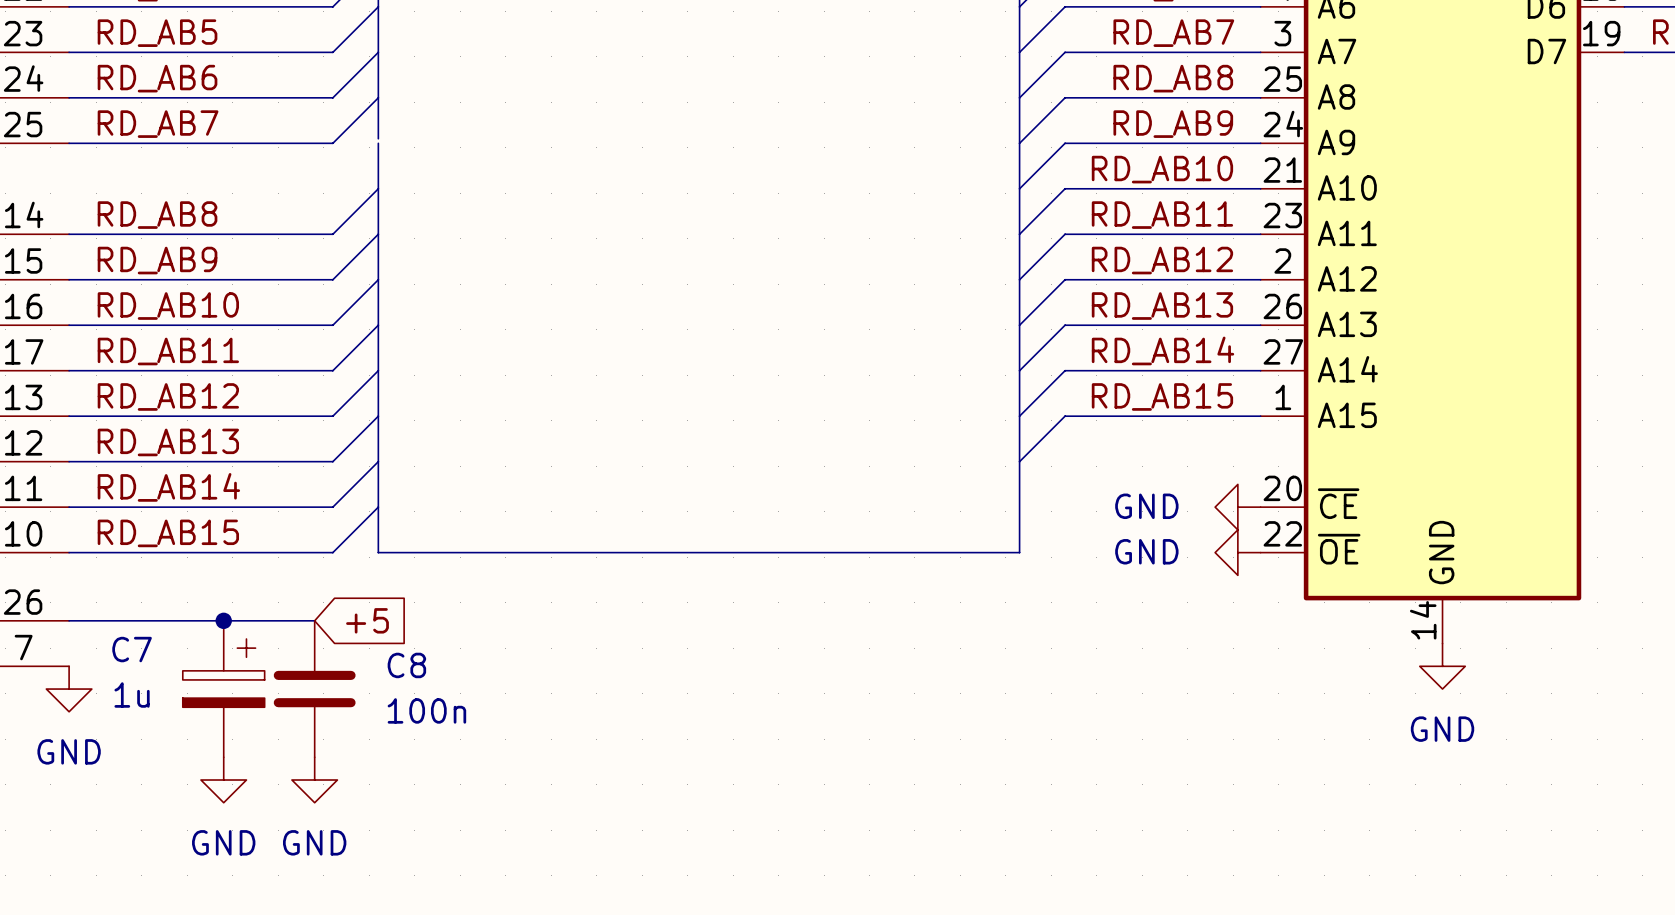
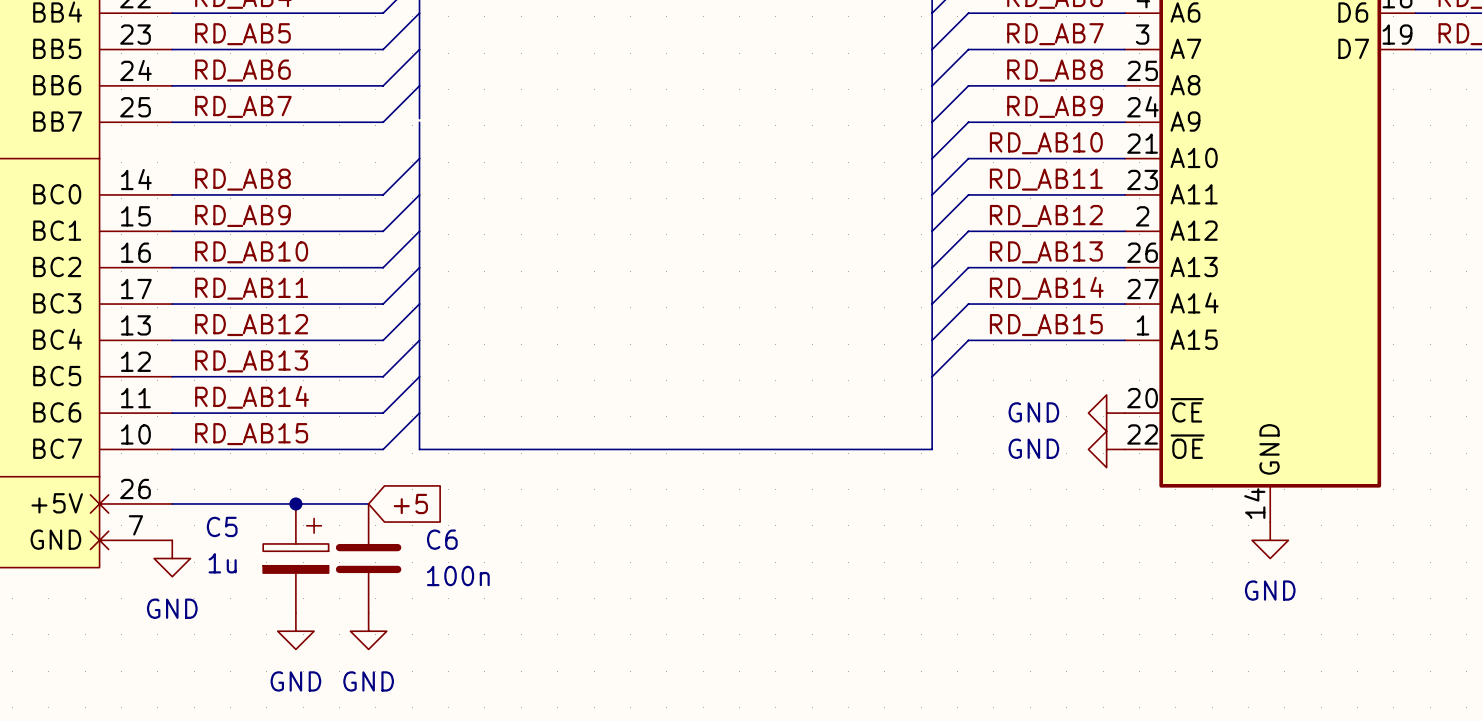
C7 name: C7 (132, 649) -> C5 (222, 526)
C8 name: C8 (406, 665) -> C6 (442, 539)

